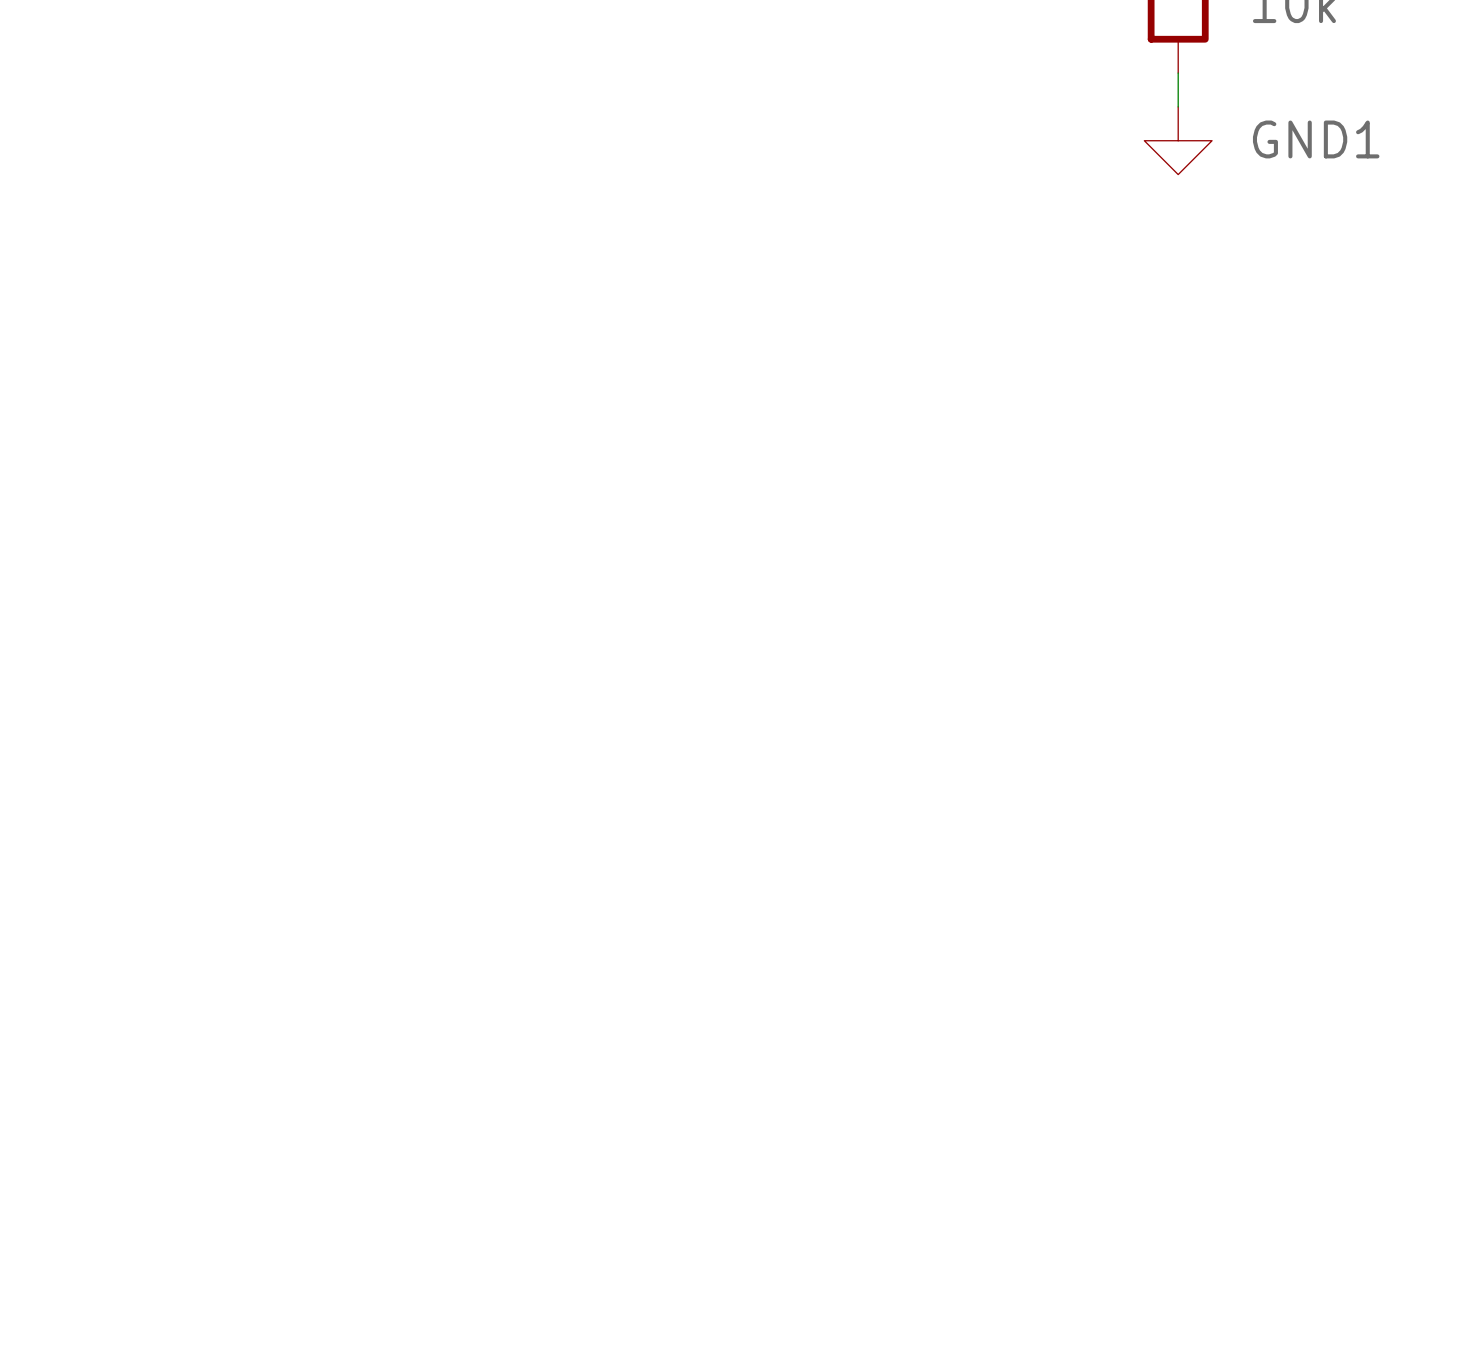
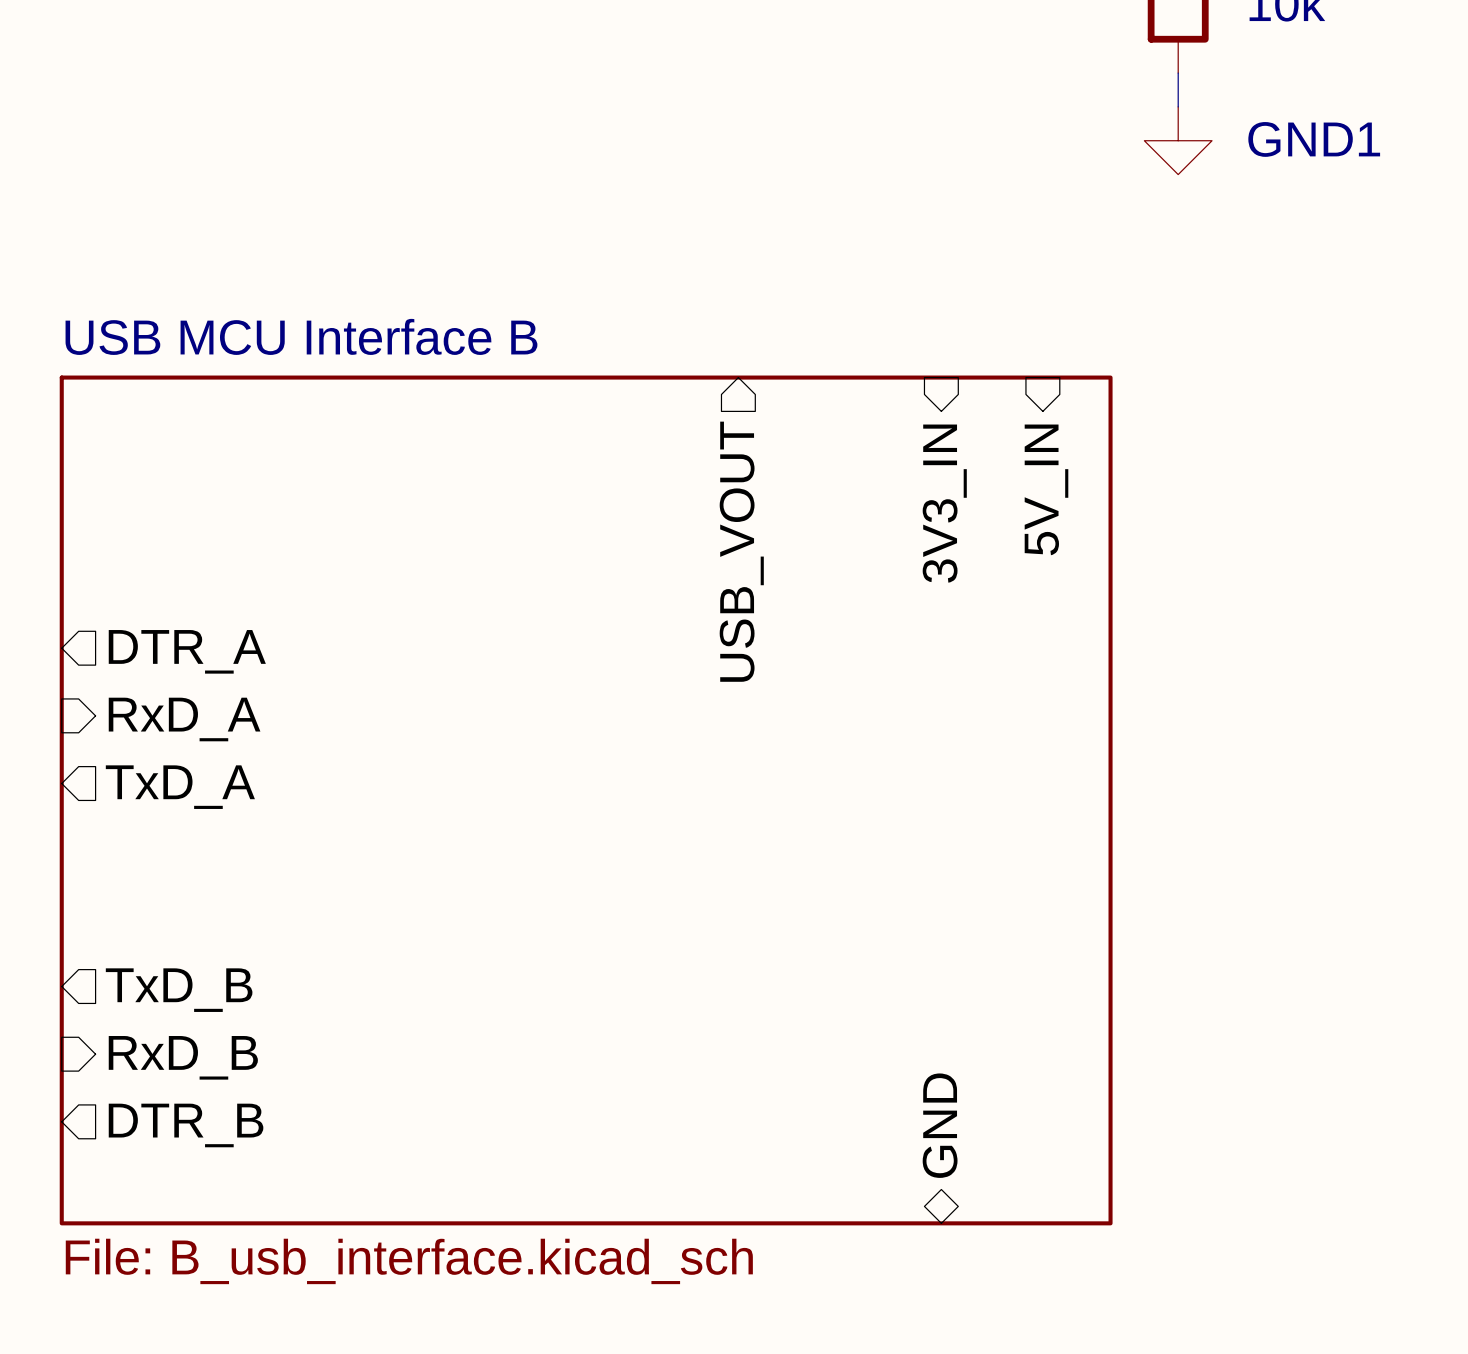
sheet pin: none -> 5V_IN (1046, 489)
sheet pin: none -> 3V3_IN (944, 503)
sheet pin: none -> USB_VOUT (741, 551)
sheet pin: none -> DTR_A (187, 651)
sheet pin: none -> RxD_A (184, 719)
sheet pin: none -> TxD_A (180, 787)
sheet USB MCU Interface B: none -> File: B_usb_interface.kicad_sch (586, 800)
sheet pin: none -> TxD_B (179, 990)
sheet pin: none -> RxD_B (183, 1057)
sheet pin: none -> DTR_B (186, 1125)
sheet pin: none -> GND (940, 1125)

